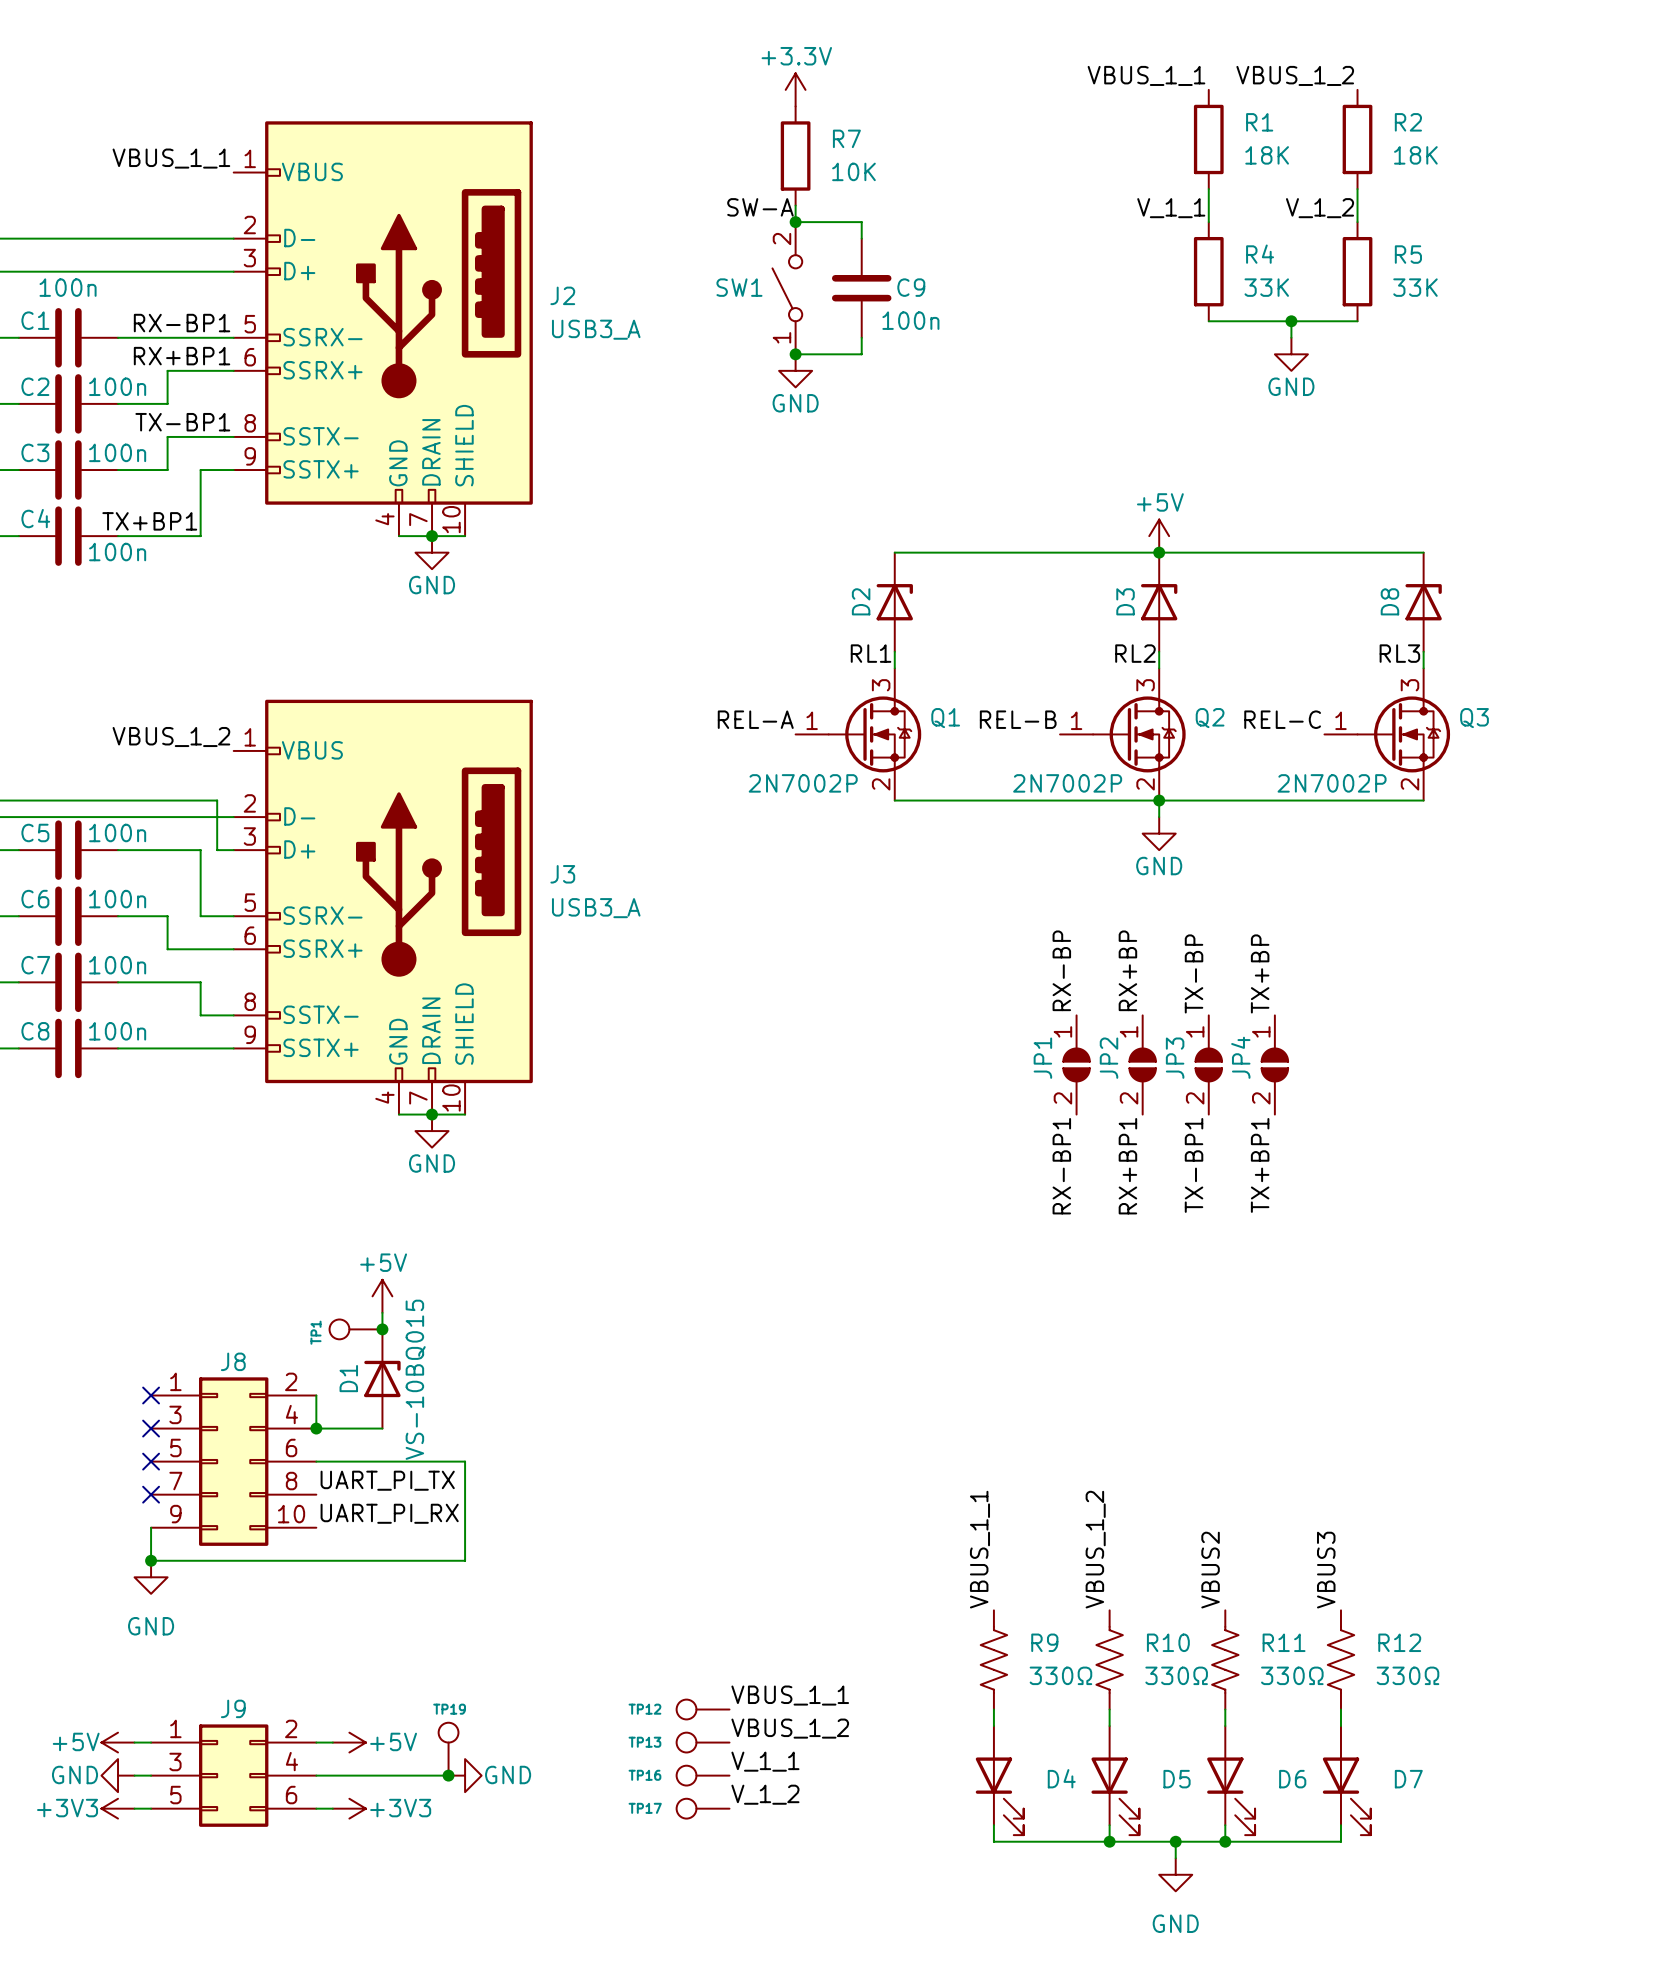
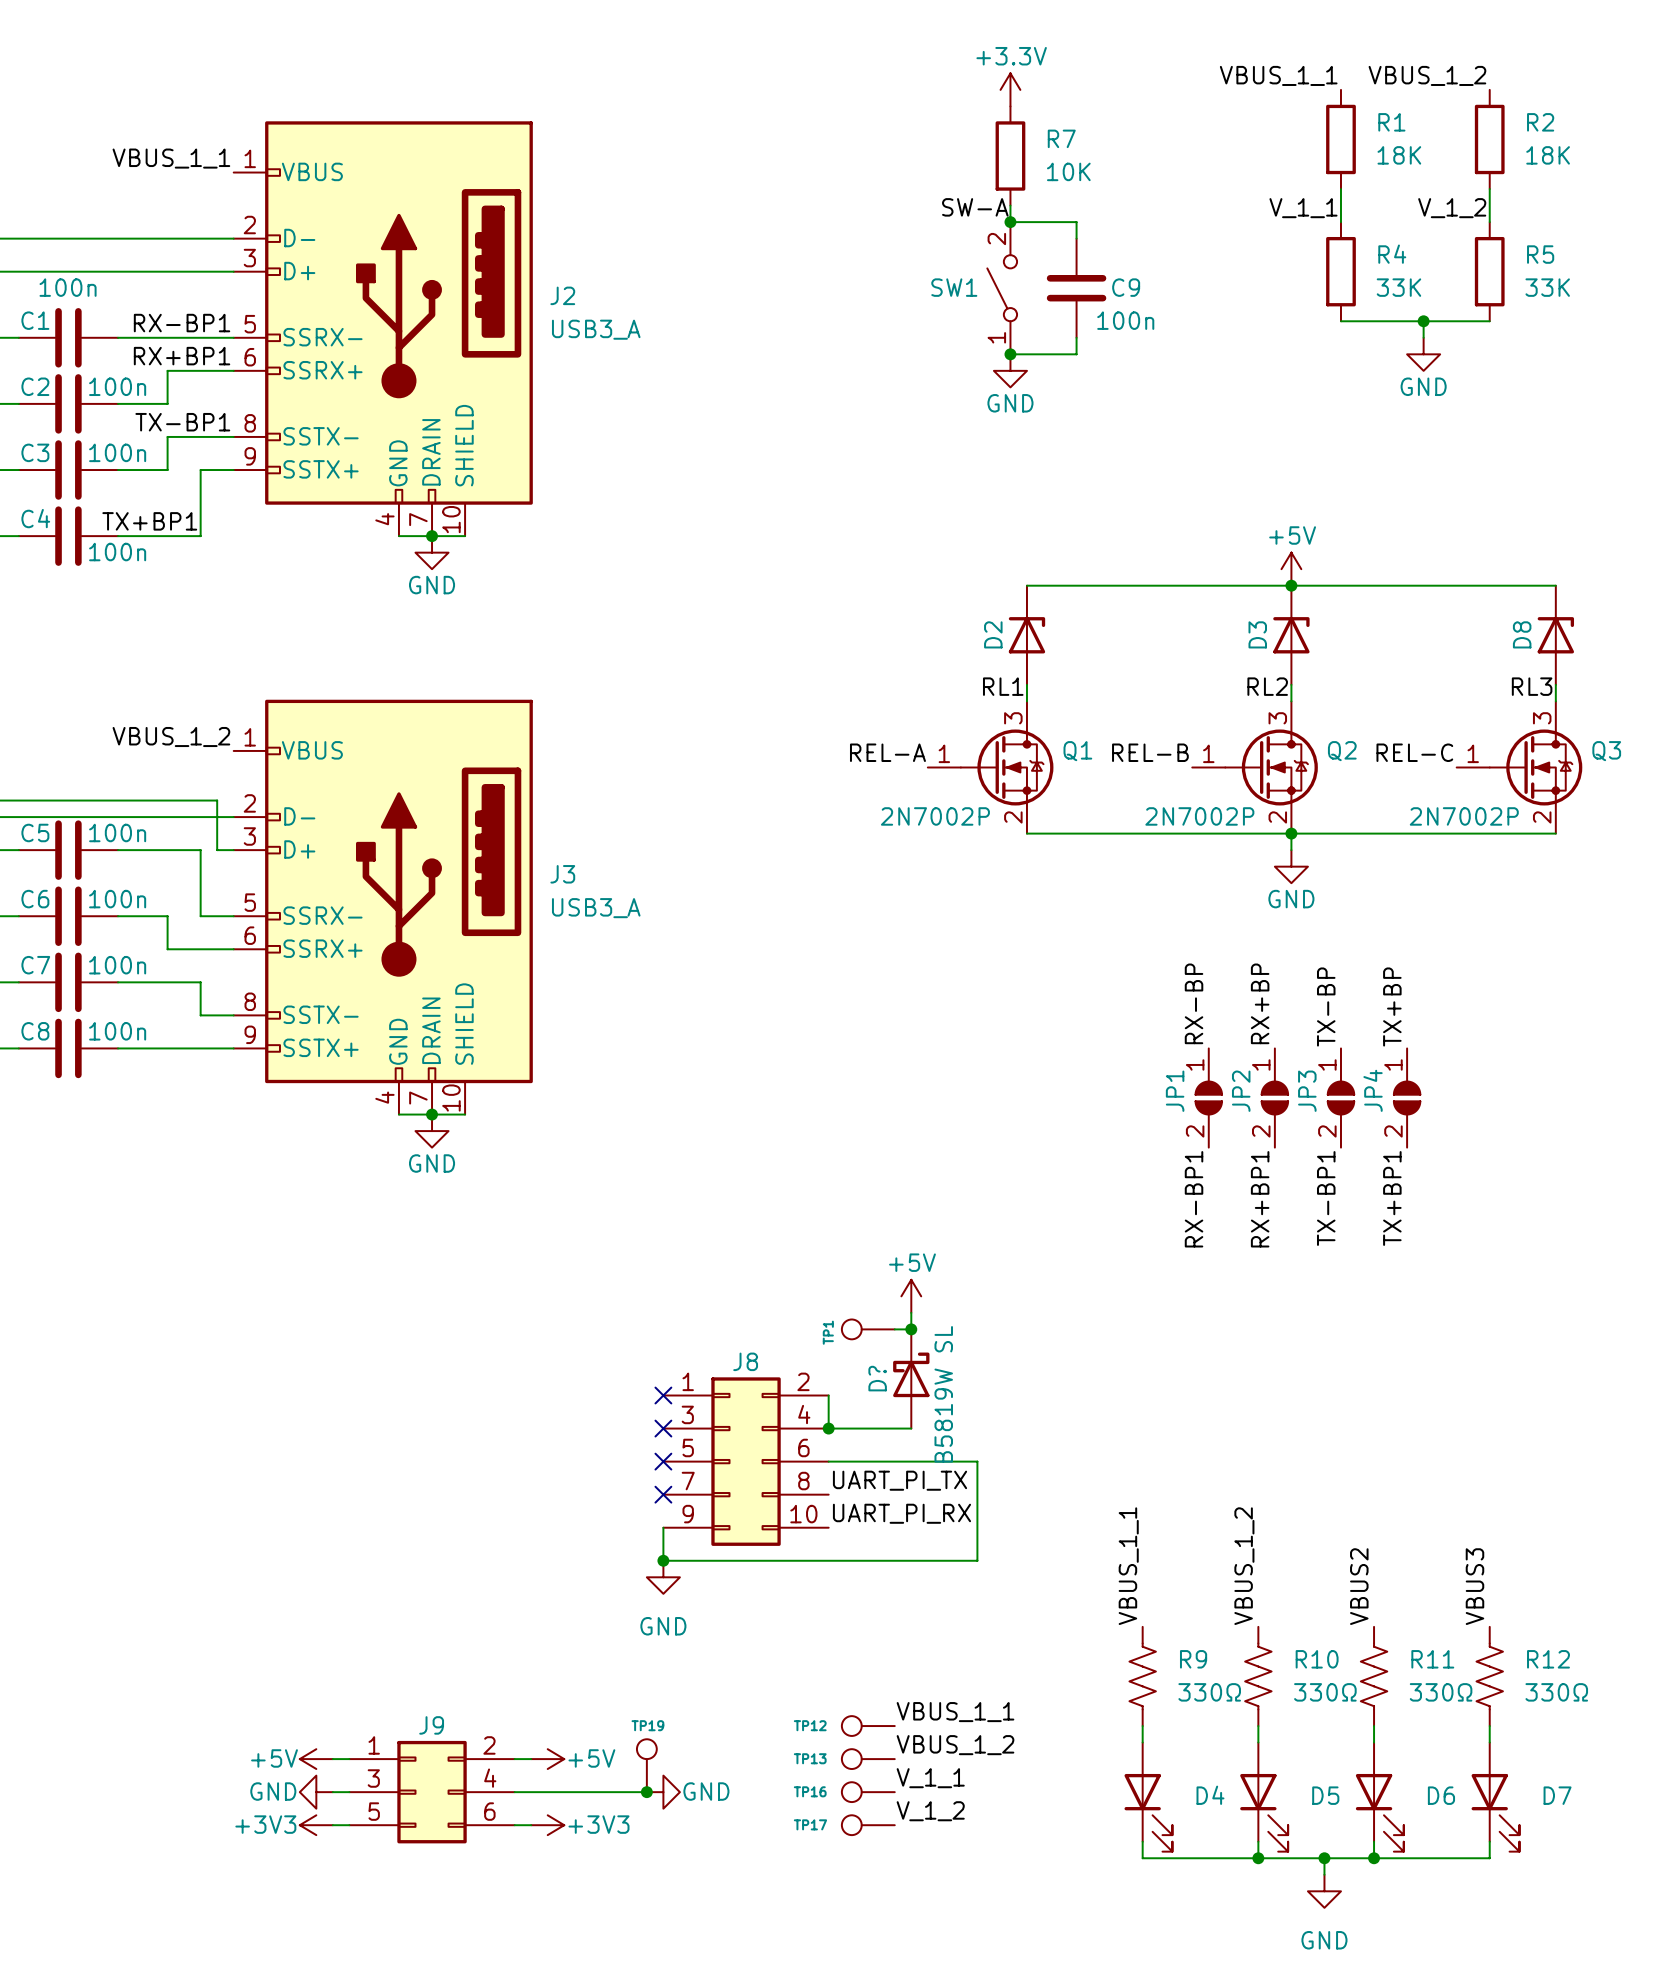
label position: VBUS_1_1 (1146, 75) -> VBUS_1_1 (1278, 75)
label position: VBUS_1_2 (1295, 75) -> VBUS_1_2 (1427, 75)
power symbol position: +3.3V (795, 89) -> +3.3V (1010, 89)
R1 position: (1208, 139) -> (1340, 139)
R2 position: (1357, 139) -> (1489, 139)
R7 position: (795, 156) -> (1010, 156)
wire: (1208, 189) (1208, 222) -> (1340, 189) (1340, 222)
wire: (1357, 189) (1357, 222) -> (1489, 189) (1489, 222)
wire: (795, 205) (795, 222) (861, 222) (861, 238) -> (1010, 205) (1010, 222) (1076, 222) (1076, 238)
label position: SW-A (760, 207) -> SW-A (975, 207)
label position: V_1_1 (1171, 208) -> V_1_1 (1303, 208)
label position: V_1_2 (1320, 208) -> V_1_2 (1452, 208)
junction: (795, 222) -> none
junction: none -> (1010, 222)
R4 position: (1208, 271) -> (1340, 271)
R5 position: (1357, 271) -> (1489, 271)
SW1 position: (787, 288) -> (1002, 288)
C9 position: (861, 288) -> (1076, 288)
wire: (1208, 321) (1340, 321) -> (1357, 321) (1489, 321)
wire: (1291, 321) (1291, 337) -> (1423, 321) (1423, 337)
junction: (1291, 321) -> none
junction: none -> (1423, 321)
wire: (861, 337) (861, 354) (795, 354) -> (1076, 337) (1076, 354) (1010, 354)
junction: (795, 354) -> none
junction: none -> (1010, 354)
power symbol position: GND (1291, 354) -> GND (1423, 354)
power symbol: GND (795, 370) -> none
power symbol: none -> GND (1010, 370)
power symbol position: +5V (1159, 536) -> +5V (1291, 569)
wire: (894, 552) (1423, 552) -> (1026, 585) (1555, 585)
junction: (1159, 552) -> none
junction: none -> (1291, 585)
D2 position: (894, 602) -> (1026, 635)
D3 position: (1159, 602) -> (1291, 635)
D8 position: (1423, 602) -> (1555, 635)
wire: (894, 651) (894, 668) -> (1026, 684) (1026, 701)
wire: (1159, 651) (1159, 668) -> (1291, 684) (1291, 701)
wire: (1423, 651) (1423, 668) -> (1555, 684) (1555, 701)
label position: RL1 (871, 653) -> RL1 (1003, 686)
label position: RL2 (1135, 653) -> RL2 (1267, 686)
label position: RL3 (1399, 653) -> RL3 (1532, 686)
label position: REL-A (755, 719) -> REL-A (887, 752)
label position: REL-B (1018, 719) -> REL-B (1150, 752)
label position: REL-C (1282, 719) -> REL-C (1414, 752)
Q1 position: (858, 734) -> (990, 767)
Q2 position: (1122, 734) -> (1255, 767)
Q3 position: (1387, 734) -> (1519, 767)
wire: (894, 800) (1423, 800) -> (1026, 833) (1555, 833)
wire: (1159, 800) (1159, 817) -> (1291, 833) (1291, 850)
junction: (1159, 800) -> none
power symbol position: GND (1159, 833) -> GND (1291, 866)
junction: none -> (1291, 833)
label position: RX-BP (1061, 970) -> RX-BP (1194, 1003)
label position: RX+BP (1127, 970) -> RX+BP (1260, 1003)
label position: TX-BP (1194, 973) -> TX-BP (1326, 1007)
label position: TX+BP (1260, 973) -> TX+BP (1392, 1007)
JP1 position: (1076, 1064) -> (1208, 1098)
JP2 position: (1142, 1064) -> (1274, 1098)
JP3 position: (1208, 1064) -> (1340, 1098)
JP4 position: (1274, 1064) -> (1407, 1098)
label position: TX-BP1 (1194, 1165) -> TX-BP1 (1326, 1198)
label position: TX+BP1 (1260, 1165) -> TX+BP1 (1392, 1198)
label position: RX-BP1 (1061, 1166) -> RX-BP1 (1194, 1199)
label position: RX+BP1 (1127, 1166) -> RX+BP1 (1260, 1199)
power symbol: +5V (382, 1296) -> none
power symbol: none -> +5V (911, 1296)
wire: (382, 1312) (382, 1329) -> none
wire: none -> (911, 1312) (911, 1329) (894, 1329)
TP1 position: (356, 1329) -> (868, 1329)
junction: (382, 1329) -> none
junction: none -> (911, 1329)
D1: VS-10BQ015 (382, 1378) -> none
D?: none -> B5819W SL (911, 1378)
no-connect mark: (151, 1395) -> none
wire: (316, 1395) (316, 1428) (382, 1428) -> none
no-connect mark: none -> (663, 1395)
wire: none -> (828, 1395) (828, 1428) (911, 1428)
no-connect mark: (151, 1428) -> none
junction: (316, 1428) -> none
no-connect mark: none -> (663, 1428)
junction: none -> (828, 1428)
no-connect mark: (151, 1461) -> none
J8 position: (233, 1461) -> (746, 1461)
wire: (316, 1461) (465, 1461) (465, 1560) (151, 1560) (151, 1527) -> none
no-connect mark: none -> (663, 1461)
wire: none -> (828, 1461) (977, 1461) (977, 1560) (663, 1560) (663, 1527)
label: UART_PI_TX (387, 1480) -> none
label: none -> UART_PI_TX (900, 1480)
no-connect mark: (151, 1494) -> none
no-connect mark: none -> (663, 1494)
label: UART_PI_RX (389, 1513) -> none
label: none -> UART_PI_RX (901, 1513)
label: VBUS_1_1 (979, 1549) -> none
label: VBUS_1_2 (1095, 1549) -> VBUS_1_1 (1128, 1566)
junction: (151, 1560) -> none
junction: none -> (663, 1560)
label: none -> VBUS_1_2 (1244, 1566)
label position: VBUS2 (1210, 1570) -> VBUS2 (1359, 1586)
label position: VBUS3 (1326, 1570) -> VBUS3 (1474, 1586)
power symbol: GND (151, 1577) -> none
power symbol: none -> GND (663, 1577)
R9 position: (993, 1659) -> (1142, 1676)
R10 position: (1109, 1659) -> (1258, 1676)
R11 position: (1225, 1659) -> (1374, 1676)
R12 position: (1340, 1659) -> (1489, 1676)
label: VBUS_1_1 (790, 1695) -> none
TP12 position: (703, 1709) -> (868, 1726)
wire: (993, 1709) (993, 1726) -> (1142, 1726) (1142, 1742)
wire: (1109, 1709) (1109, 1726) -> (1258, 1726) (1258, 1742)
wire: (1225, 1709) (1225, 1726) -> (1374, 1726) (1374, 1742)
wire: (1340, 1709) (1340, 1726) -> (1489, 1726) (1489, 1742)
label: none -> VBUS_1_1 (955, 1712)
label: VBUS_1_2 (790, 1728) -> none
power symbol: +5V (118, 1742) -> none
wire: (134, 1742) (151, 1742) -> (332, 1759) (349, 1759)
wire: (316, 1742) (332, 1742) -> (514, 1759) (531, 1759)
power symbol rotation: 0° (349, 1742) -> 180° (316, 1759)
power symbol position: +5V (349, 1742) -> +5V (316, 1759)
TP13 position: (703, 1742) -> (868, 1759)
label: none -> VBUS_1_2 (955, 1745)
TP19 position: (448, 1749) -> (646, 1765)
power symbol: none -> +5V (547, 1759)
label position: V_1_1 (765, 1761) -> V_1_1 (930, 1778)
power symbol: GND (118, 1775) -> none
wire: (134, 1775) (151, 1775) -> (332, 1792) (349, 1792)
J9 position: (233, 1775) -> (432, 1792)
wire: (316, 1775) (448, 1775) -> (514, 1792) (646, 1792)
junction: (448, 1775) -> none
power symbol: GND (465, 1775) -> none
TP16 position: (703, 1775) -> (868, 1792)
D4 position: (999, 1780) -> (1148, 1797)
D5 position: (1115, 1780) -> (1264, 1797)
D6 position: (1231, 1780) -> (1379, 1797)
D7 position: (1346, 1780) -> (1495, 1797)
power symbol: none -> GND (316, 1792)
junction: none -> (646, 1792)
power symbol: none -> GND (663, 1792)
label position: V_1_2 (765, 1794) -> V_1_2 (930, 1811)
power symbol: +3V3 (118, 1808) -> none
wire: (134, 1808) (151, 1808) -> (332, 1825) (349, 1825)
wire: (316, 1808) (332, 1808) -> (514, 1825) (531, 1825)
power symbol rotation: 0° (349, 1808) -> 180° (316, 1825)
power symbol position: +3V3 (349, 1808) -> +3V3 (316, 1825)
TP17 position: (703, 1808) -> (868, 1825)
power symbol: none -> +3V3 (547, 1825)
wire: (993, 1825) (993, 1841) (1340, 1841) (1340, 1825) -> (1142, 1841) (1142, 1858) (1489, 1858) (1489, 1841)
wire: (1109, 1825) (1109, 1841) -> (1258, 1841) (1258, 1858)
wire: (1225, 1825) (1225, 1841) -> (1374, 1841) (1374, 1858)
junction: (1109, 1841) -> none
wire: (1175, 1841) (1175, 1858) -> (1324, 1858) (1324, 1874)
junction: (1175, 1841) -> none
junction position: (1225, 1841) -> (1258, 1858)
junction: none -> (1324, 1858)
junction: none -> (1374, 1858)
power symbol position: GND (1175, 1874) -> GND (1324, 1891)

